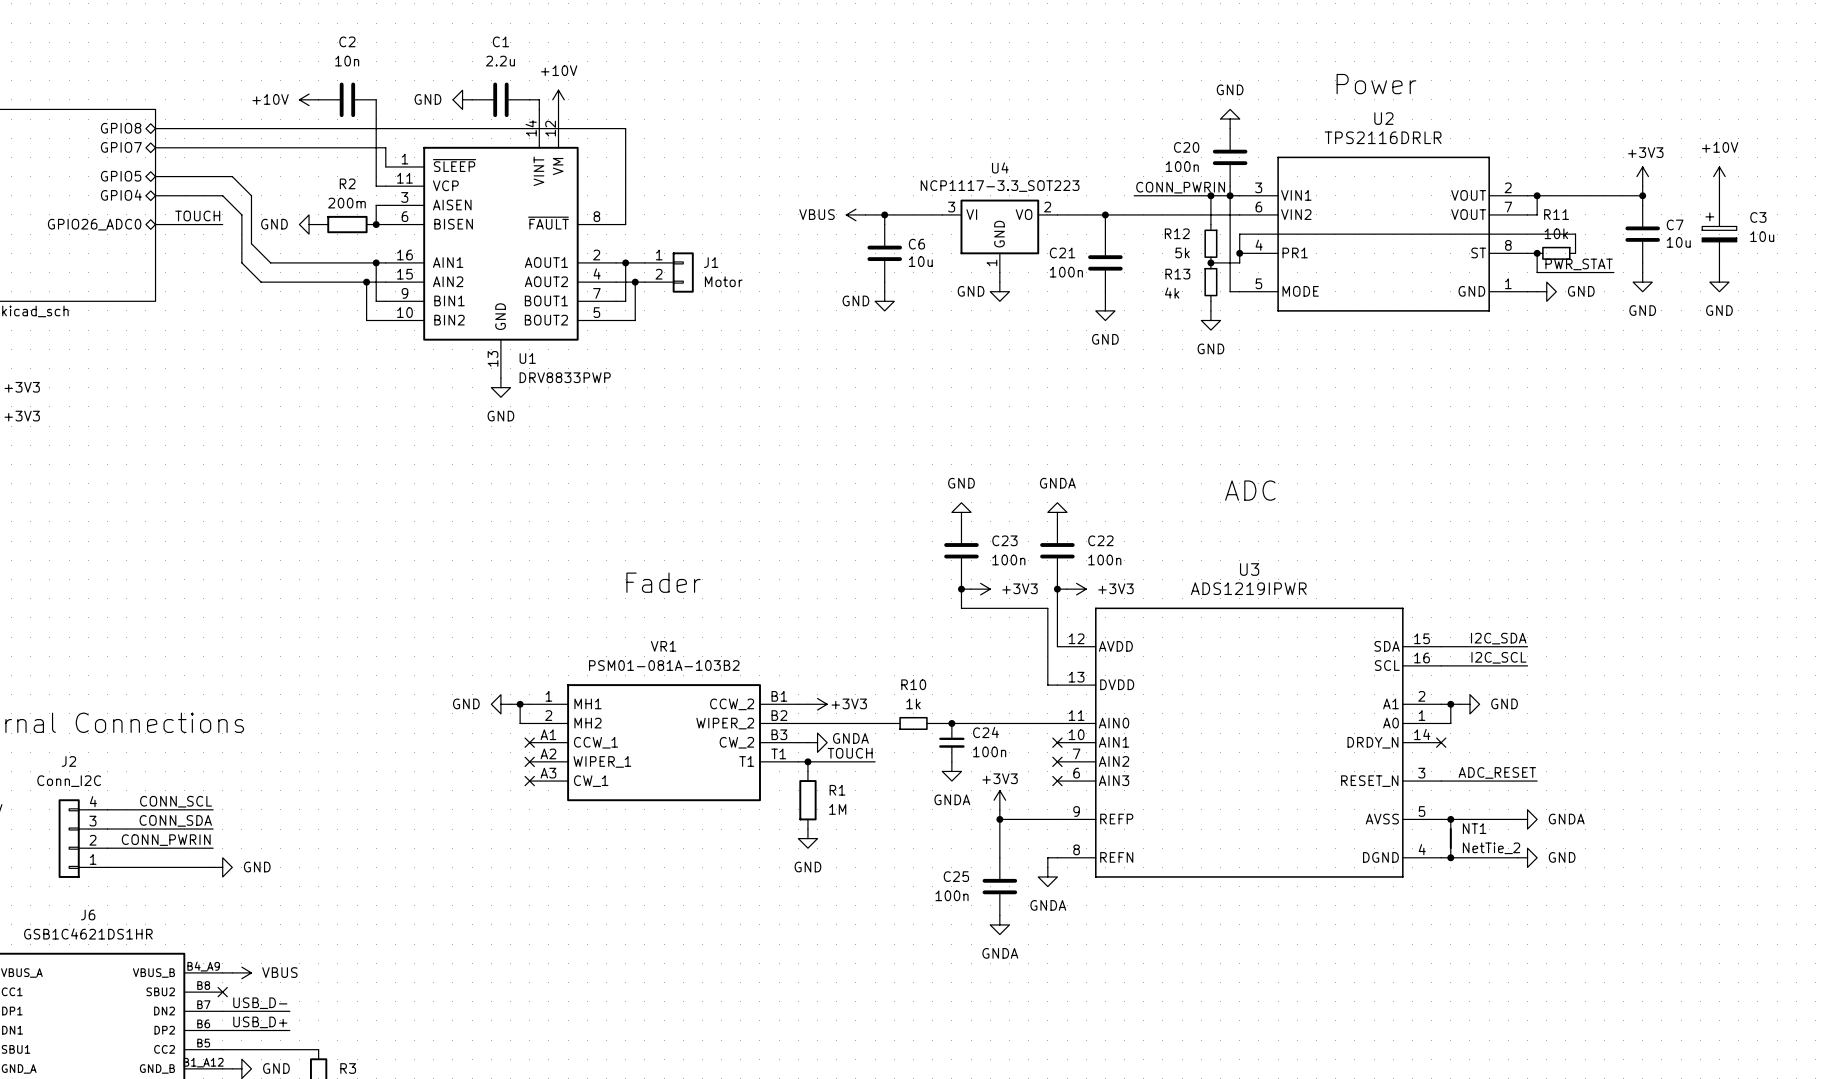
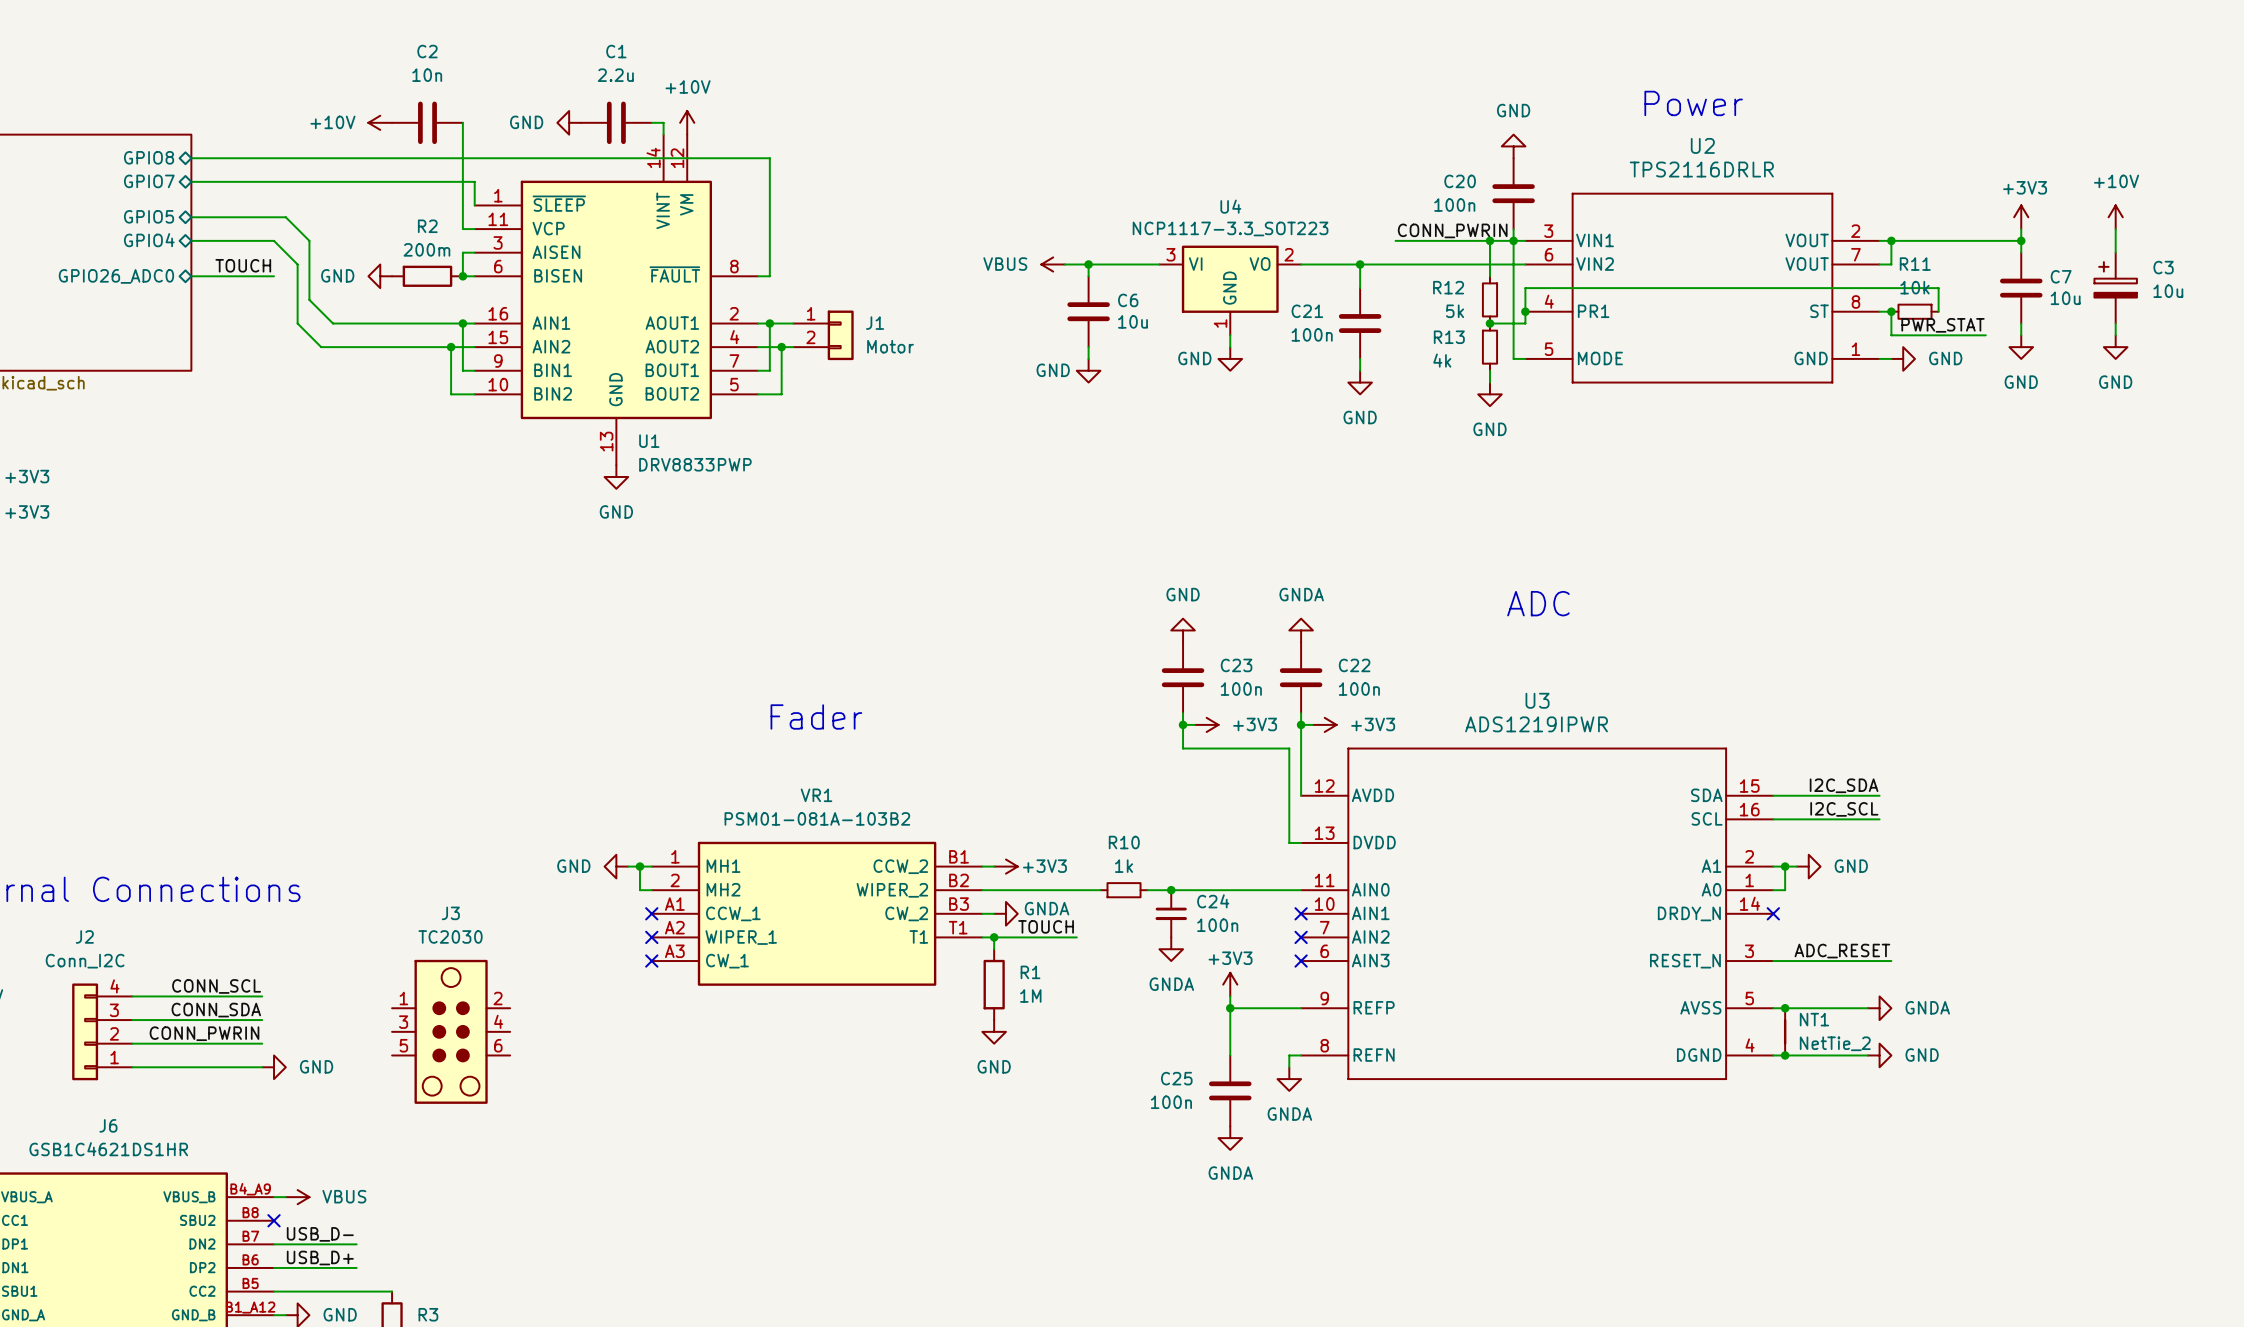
J3: none -> TC2030 (451, 1031)

